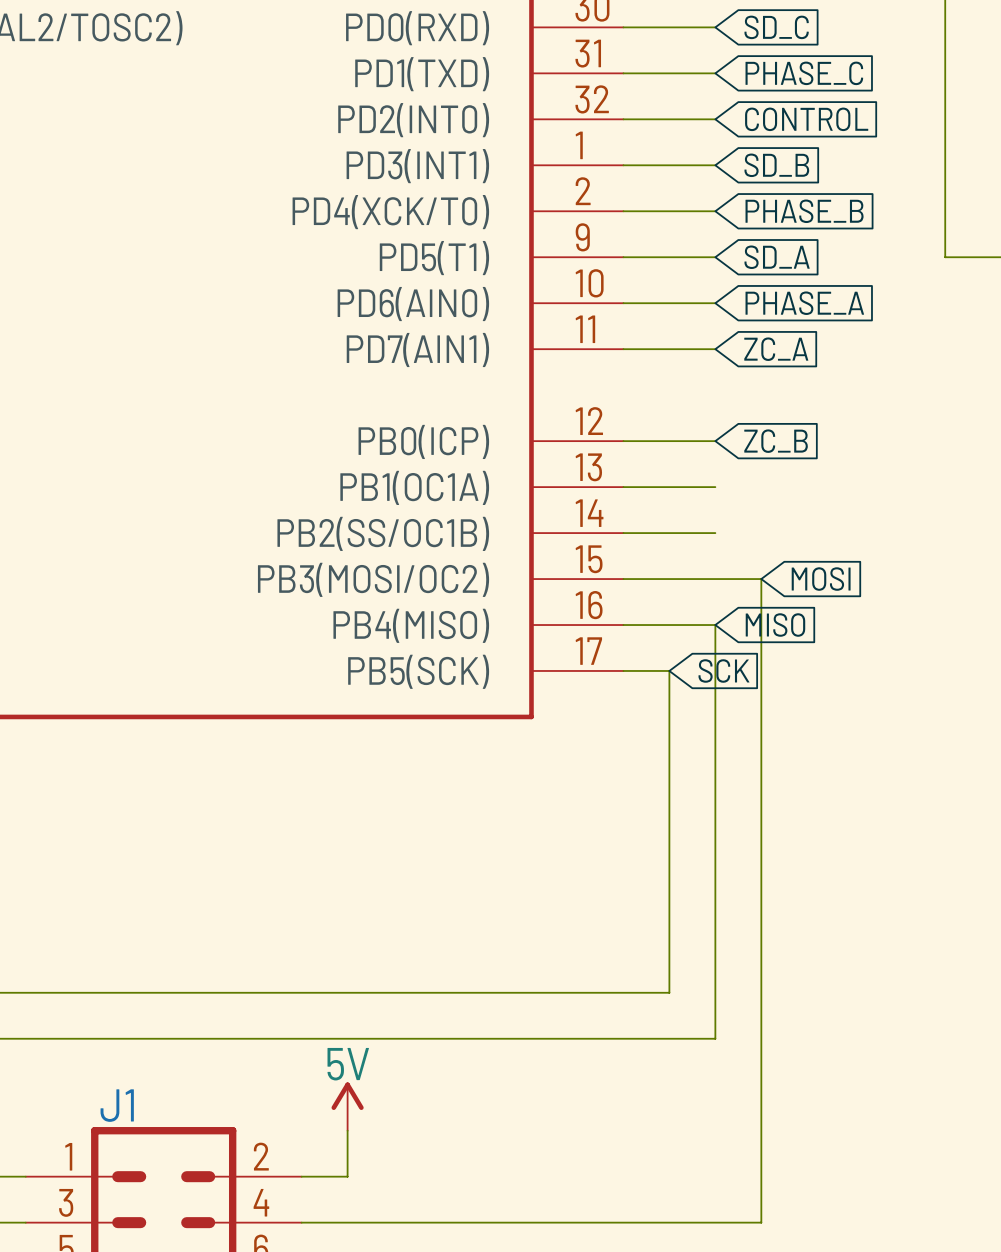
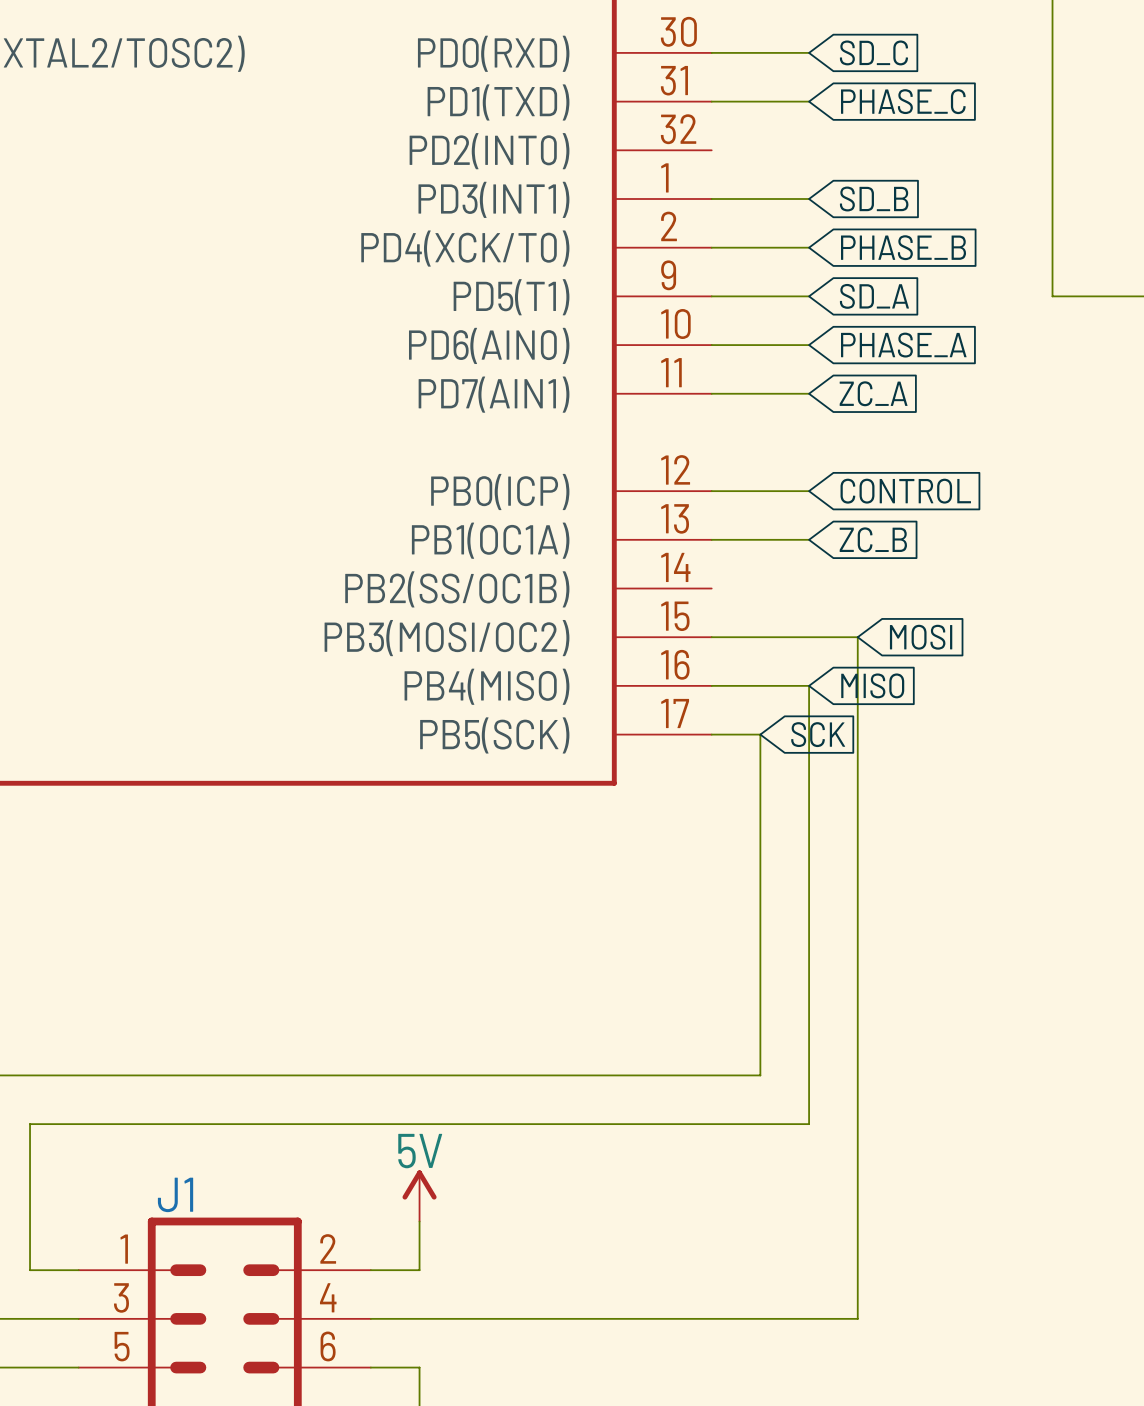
wire: (623, 119) (715, 119) -> none
global label: CONTROL (806, 119) -> none
global label: ZC_B (776, 441) -> CONTROL (905, 491)
global label: none -> ZC_B (873, 539)
wire: (623, 533) (715, 533) -> none

